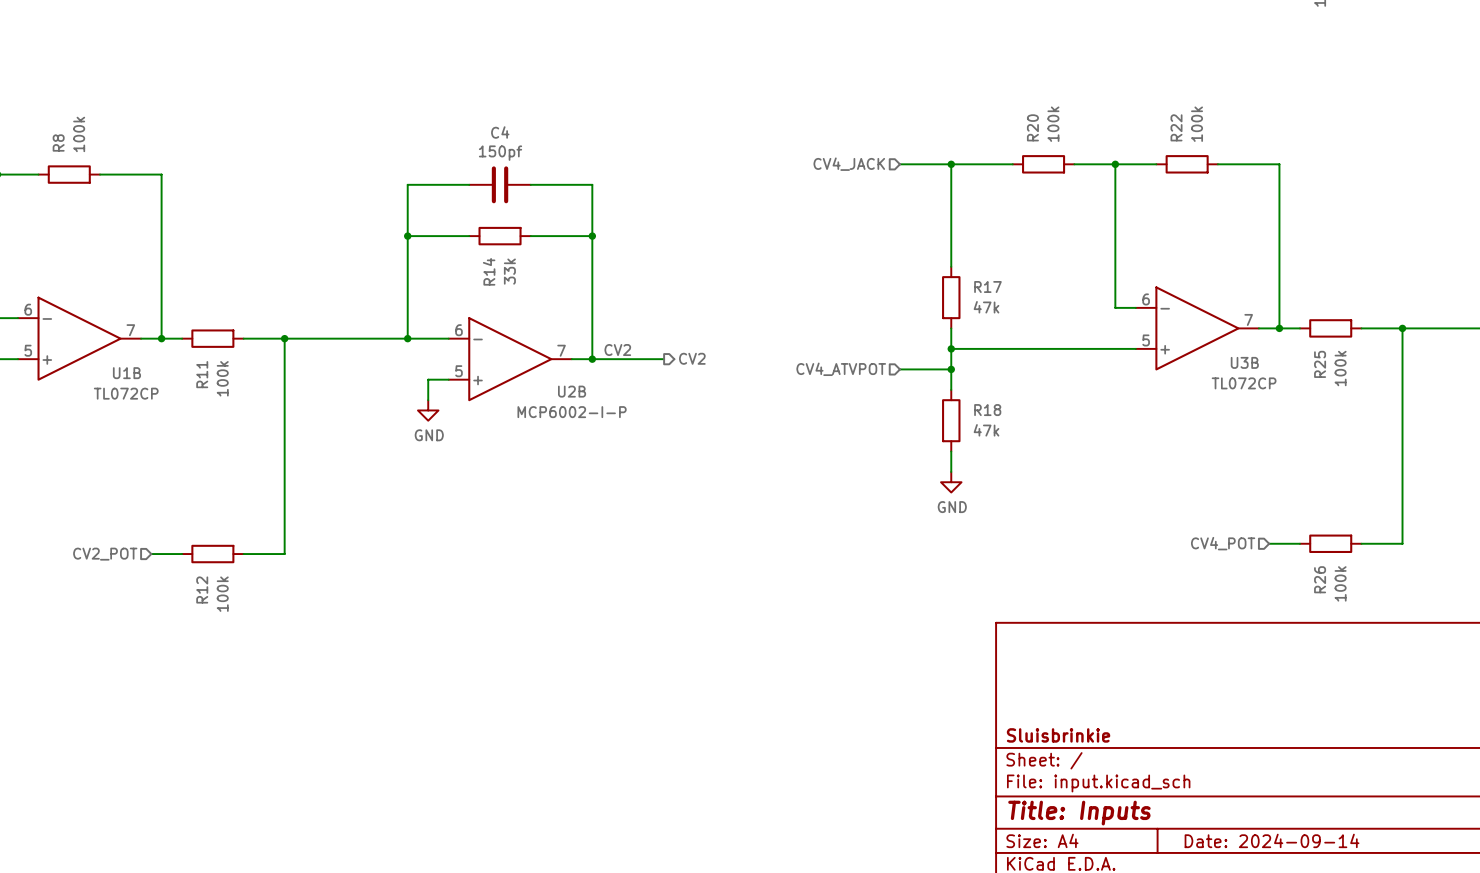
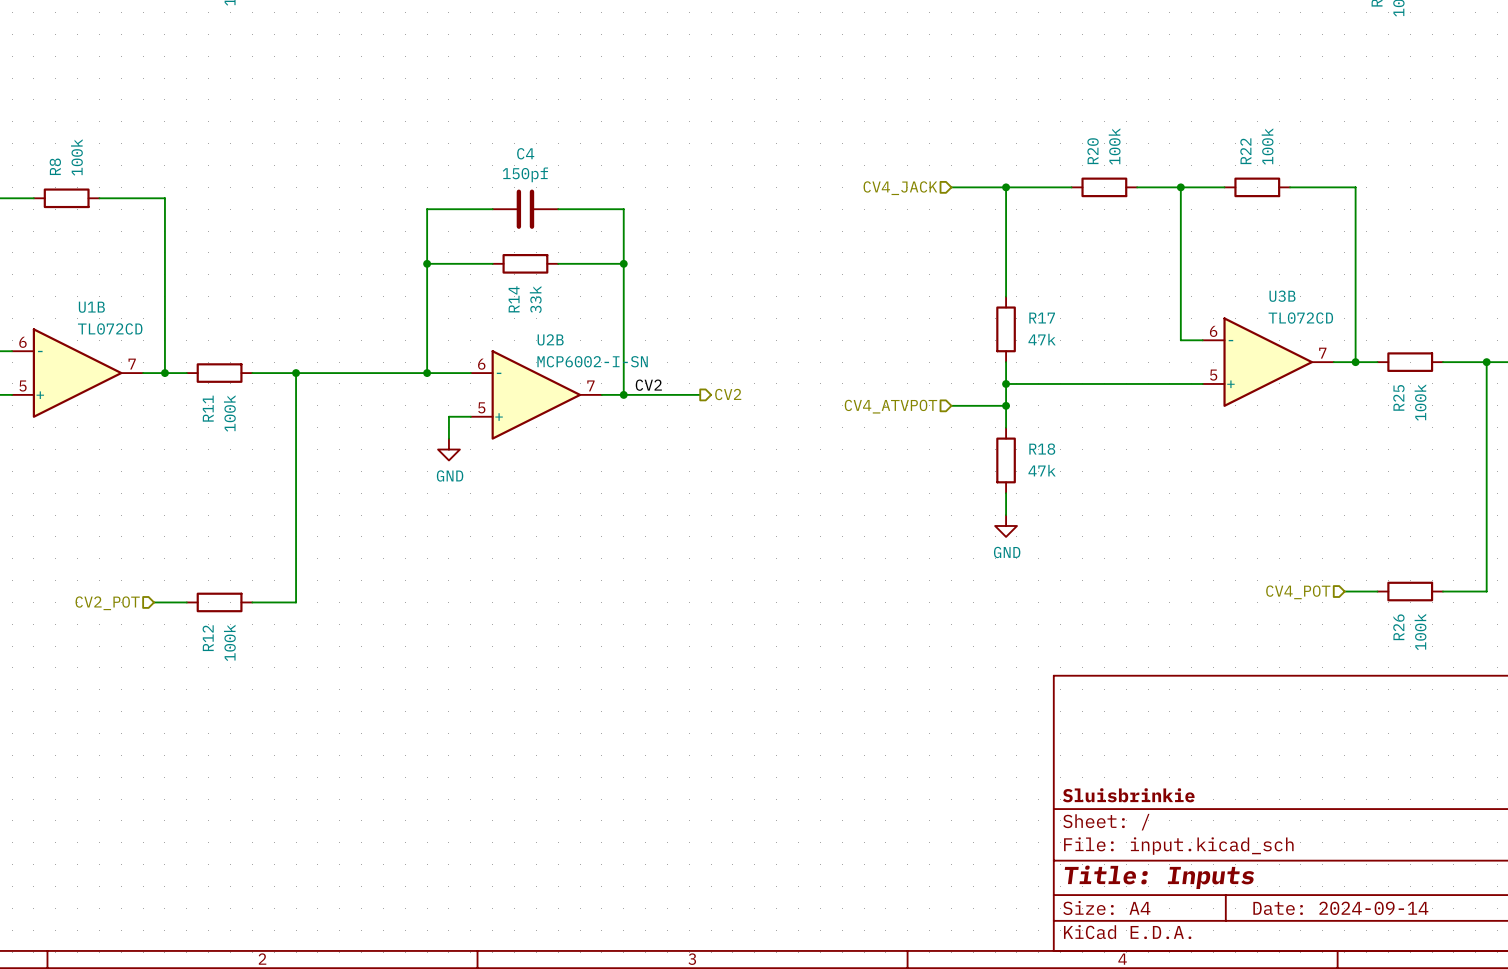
U3B name position: U3B (1244, 362) -> U3B (1282, 296)
U1B name position: U1B (126, 373) -> U1B (91, 307)
U3B value: TL072CP (1244, 383) -> TL072CD (1300, 318)
U2B name position: U2B (572, 391) -> U2B (550, 339)
U1B value: TL072CP (126, 393) -> TL072CD (110, 328)
U2B value: MCP6002-I-P (572, 412) -> MCP6002-I-SN (592, 361)

